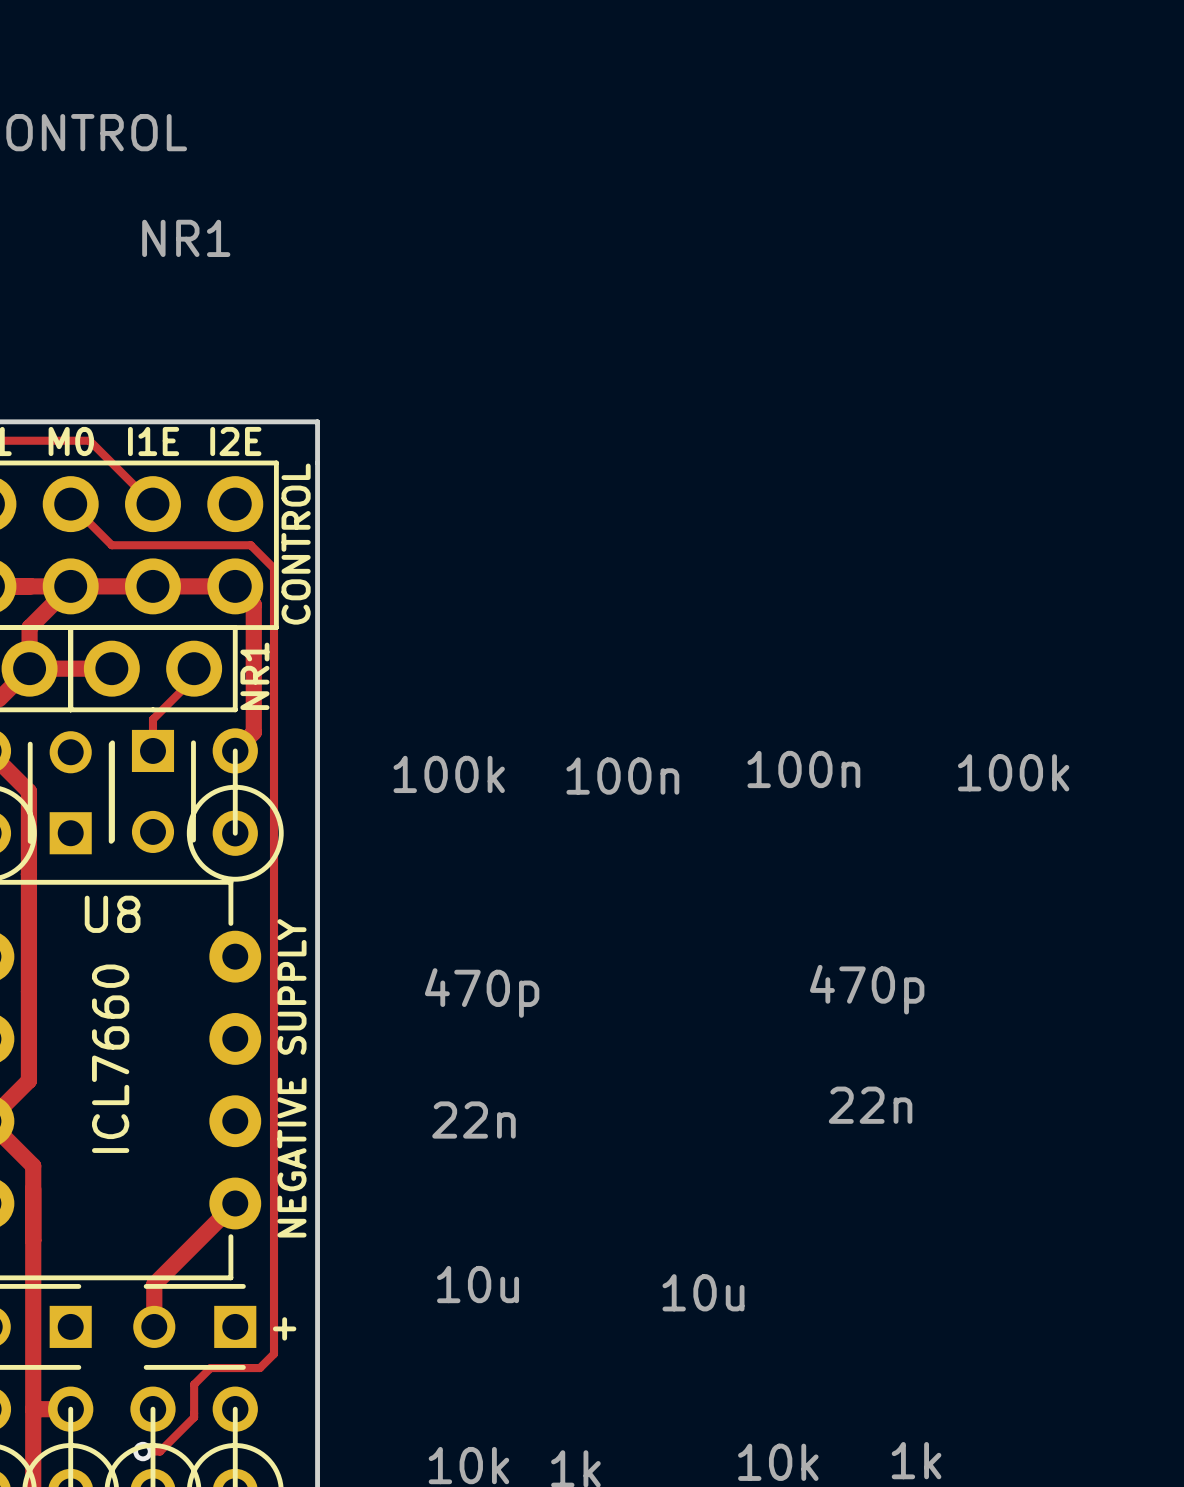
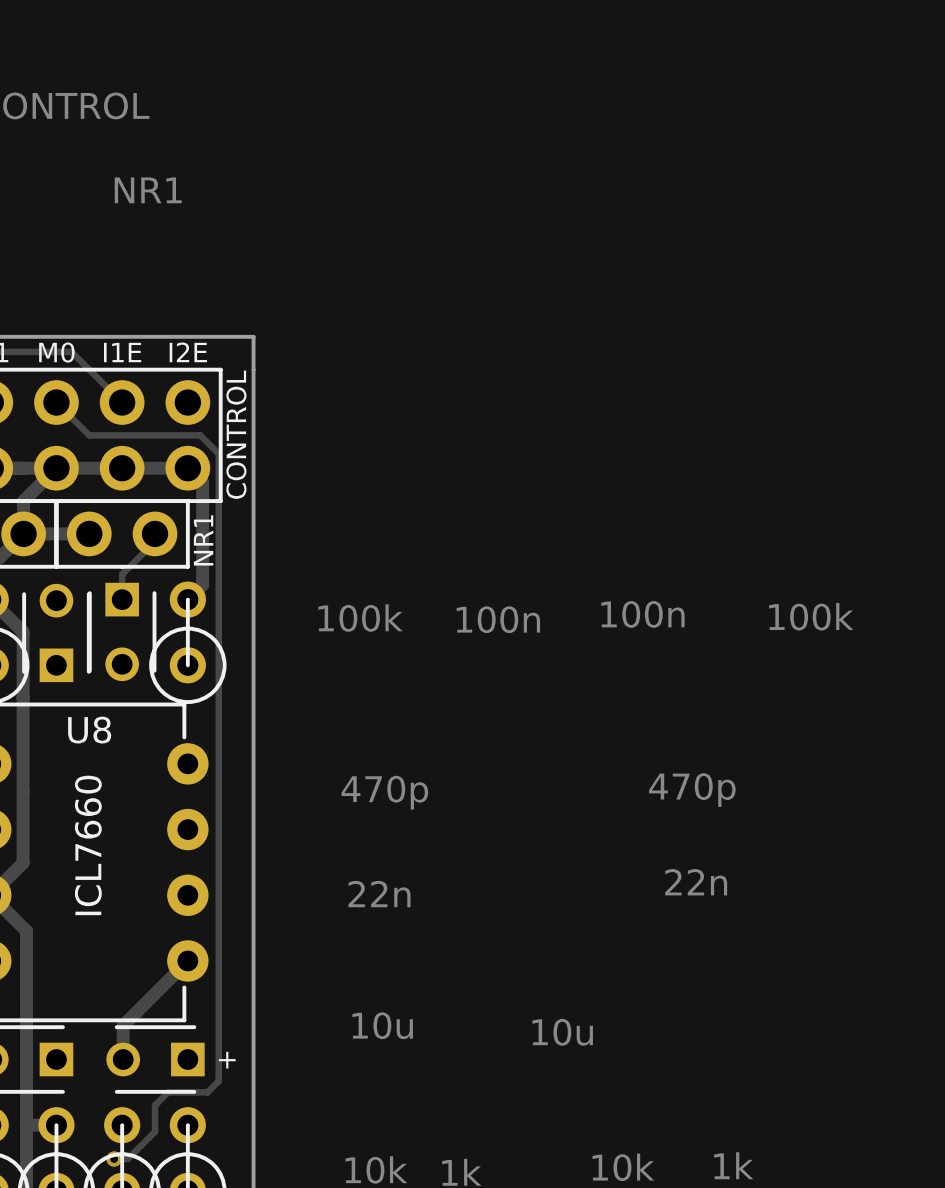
text: NEGATIVE SUPPLY (291, 1078) -> none

